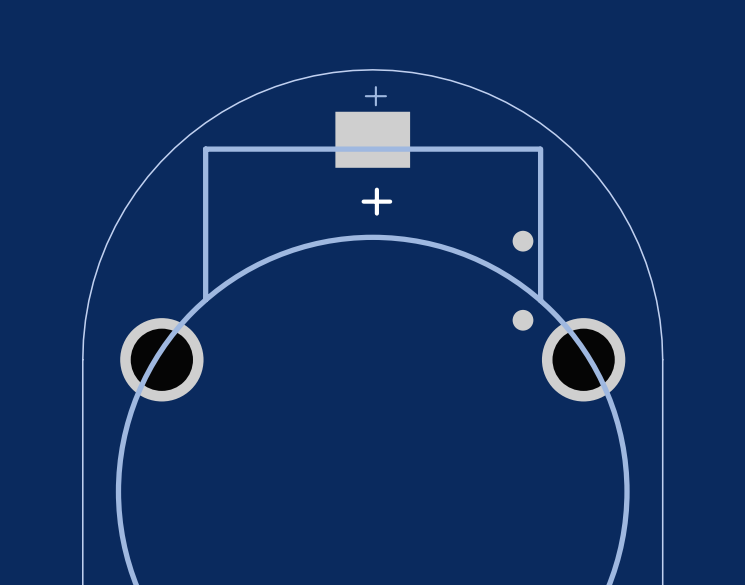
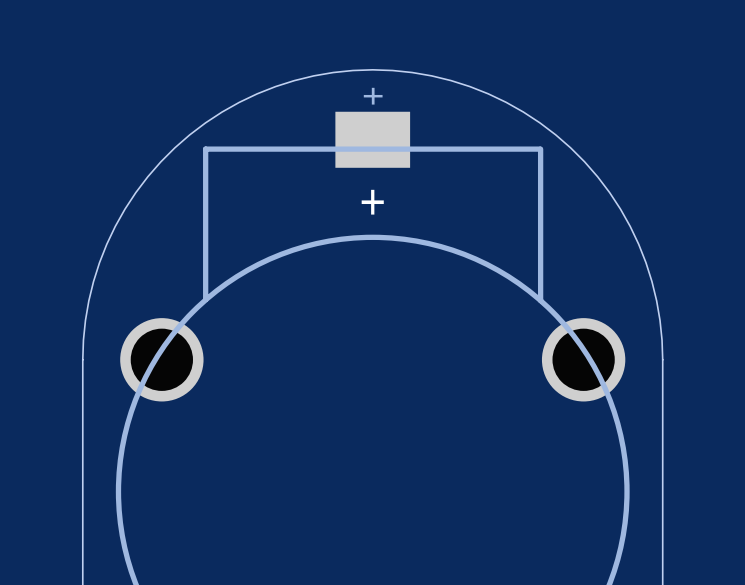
text rotation: 0° (376, 201) -> 90° clockwise (372, 202)
part: (523, 241) -> none
part: (523, 320) -> none

